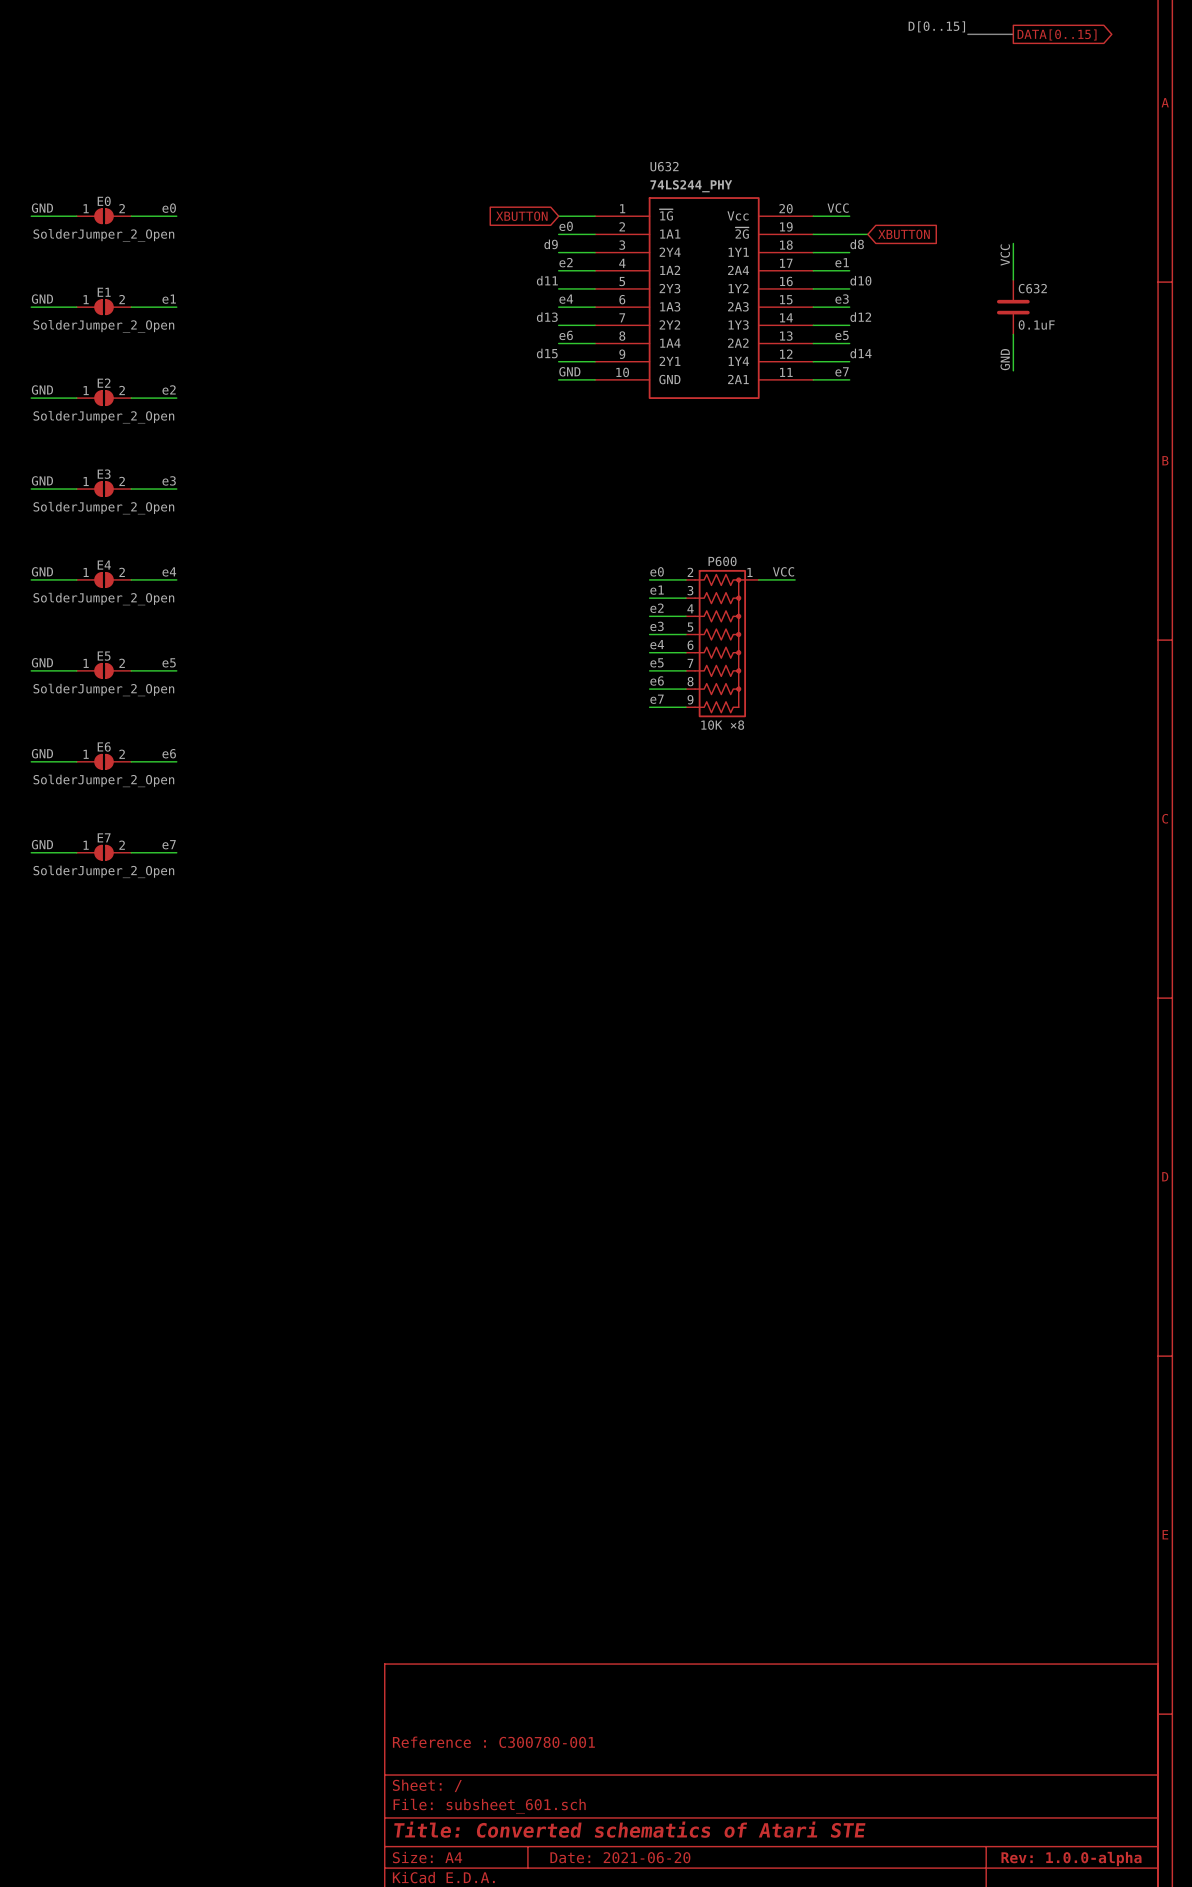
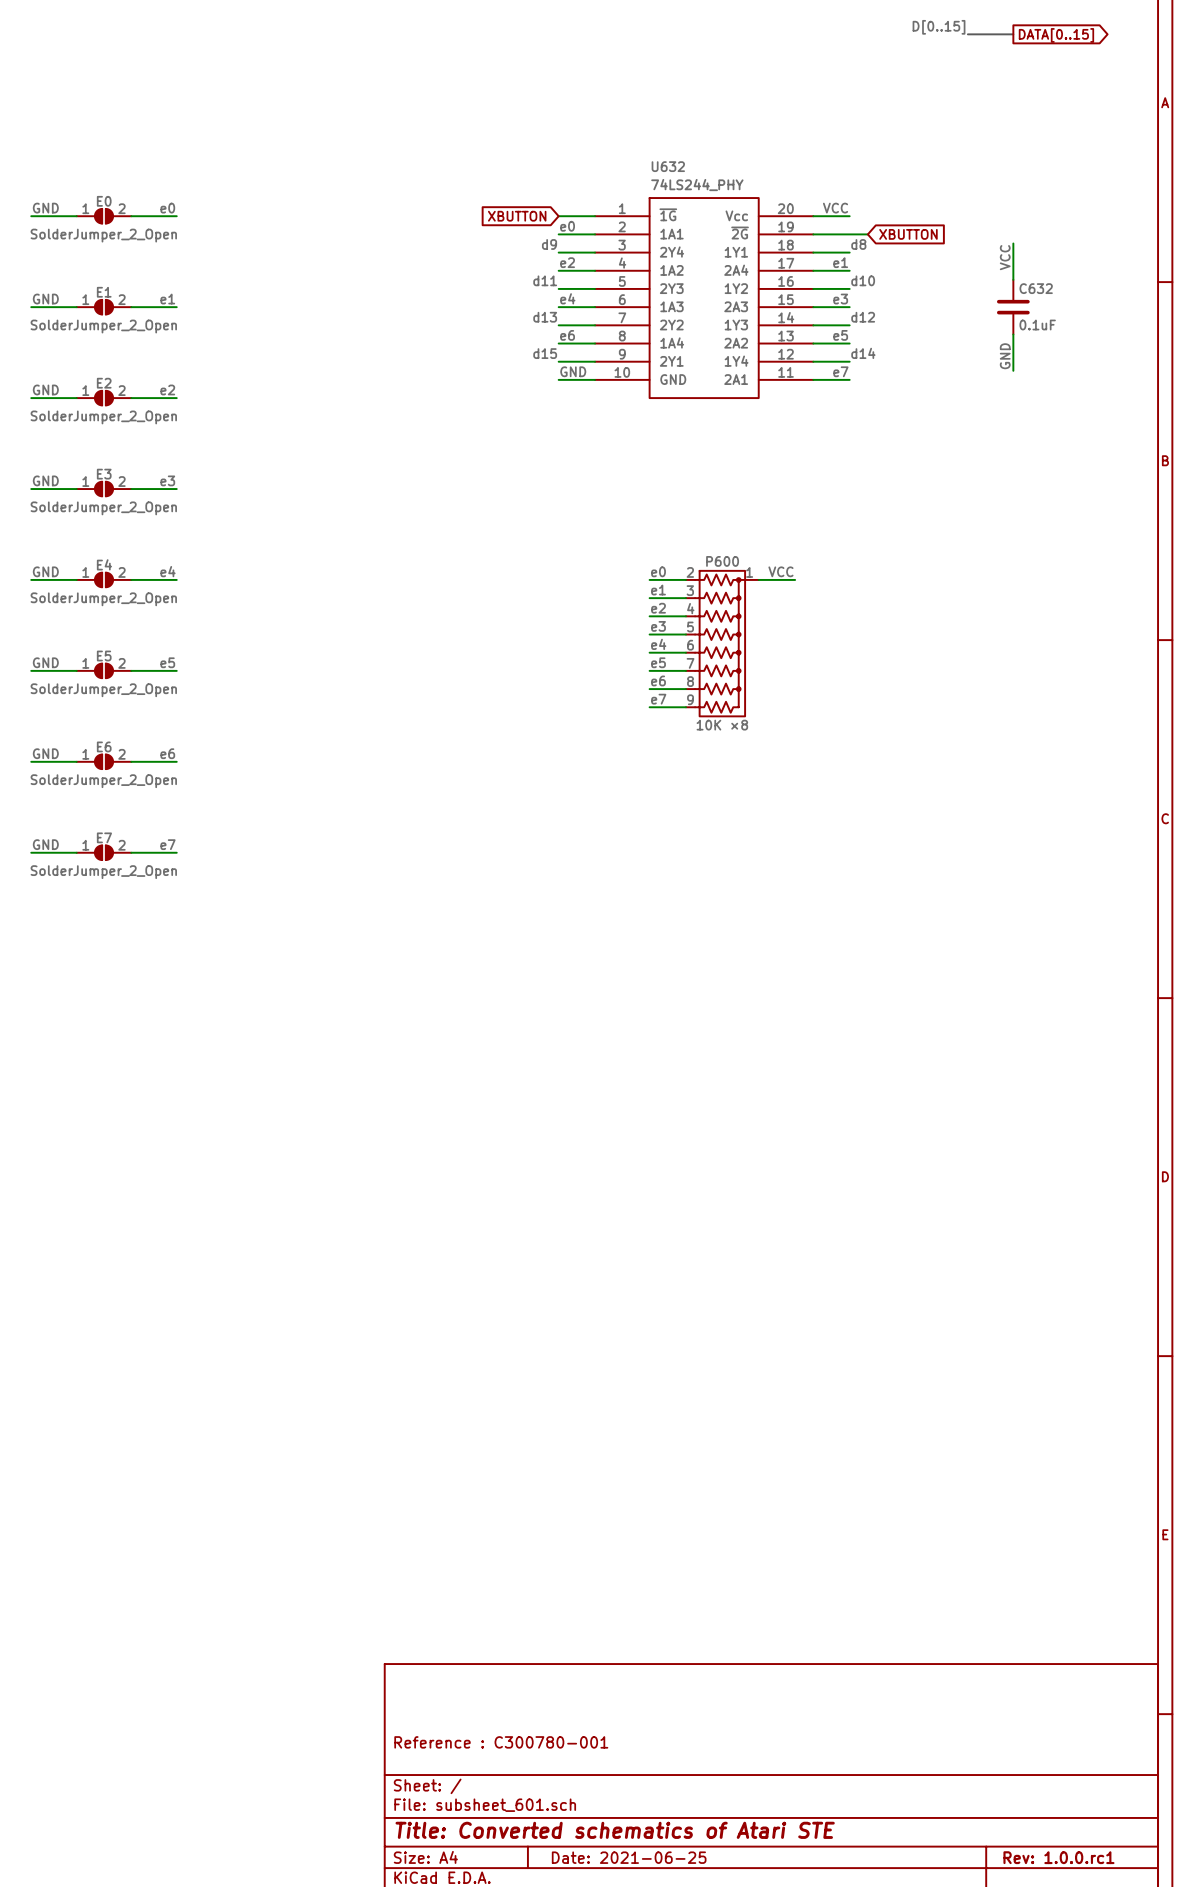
title block: Date: 2021-06-20 (620, 1857) -> Date: 2021-06-25 (629, 1857)
title block: Rev: 1.0.0-alpha (1071, 1858) -> Rev: 1.0.0.rc1 (1058, 1857)

